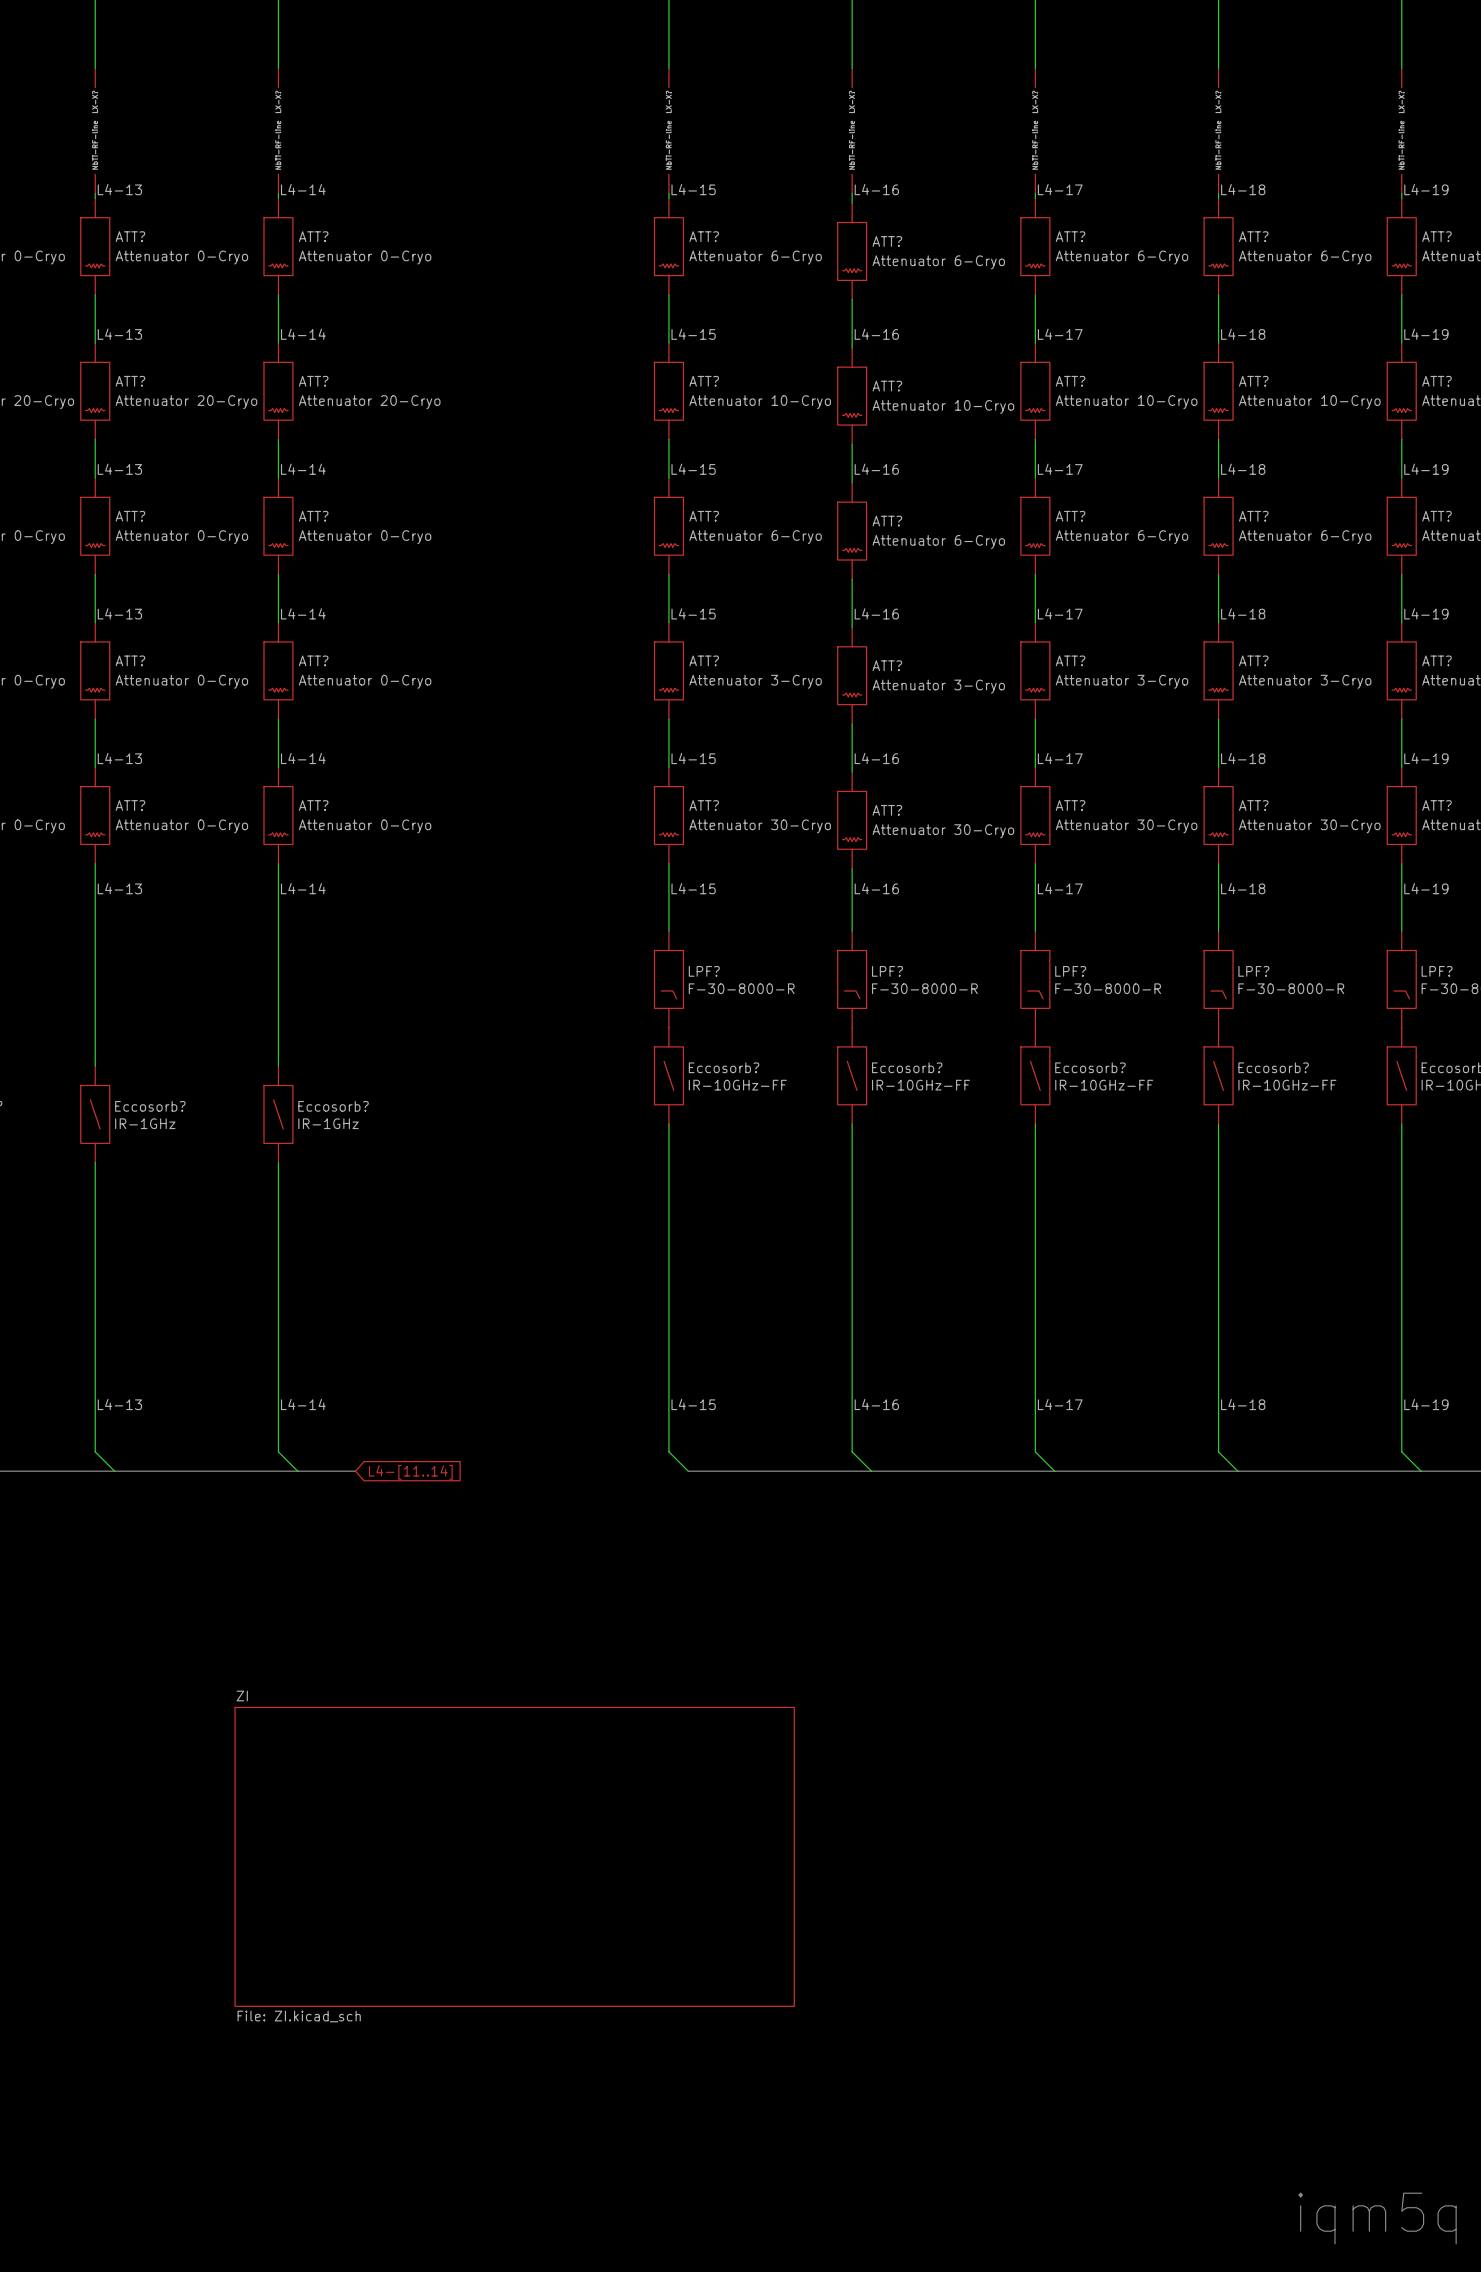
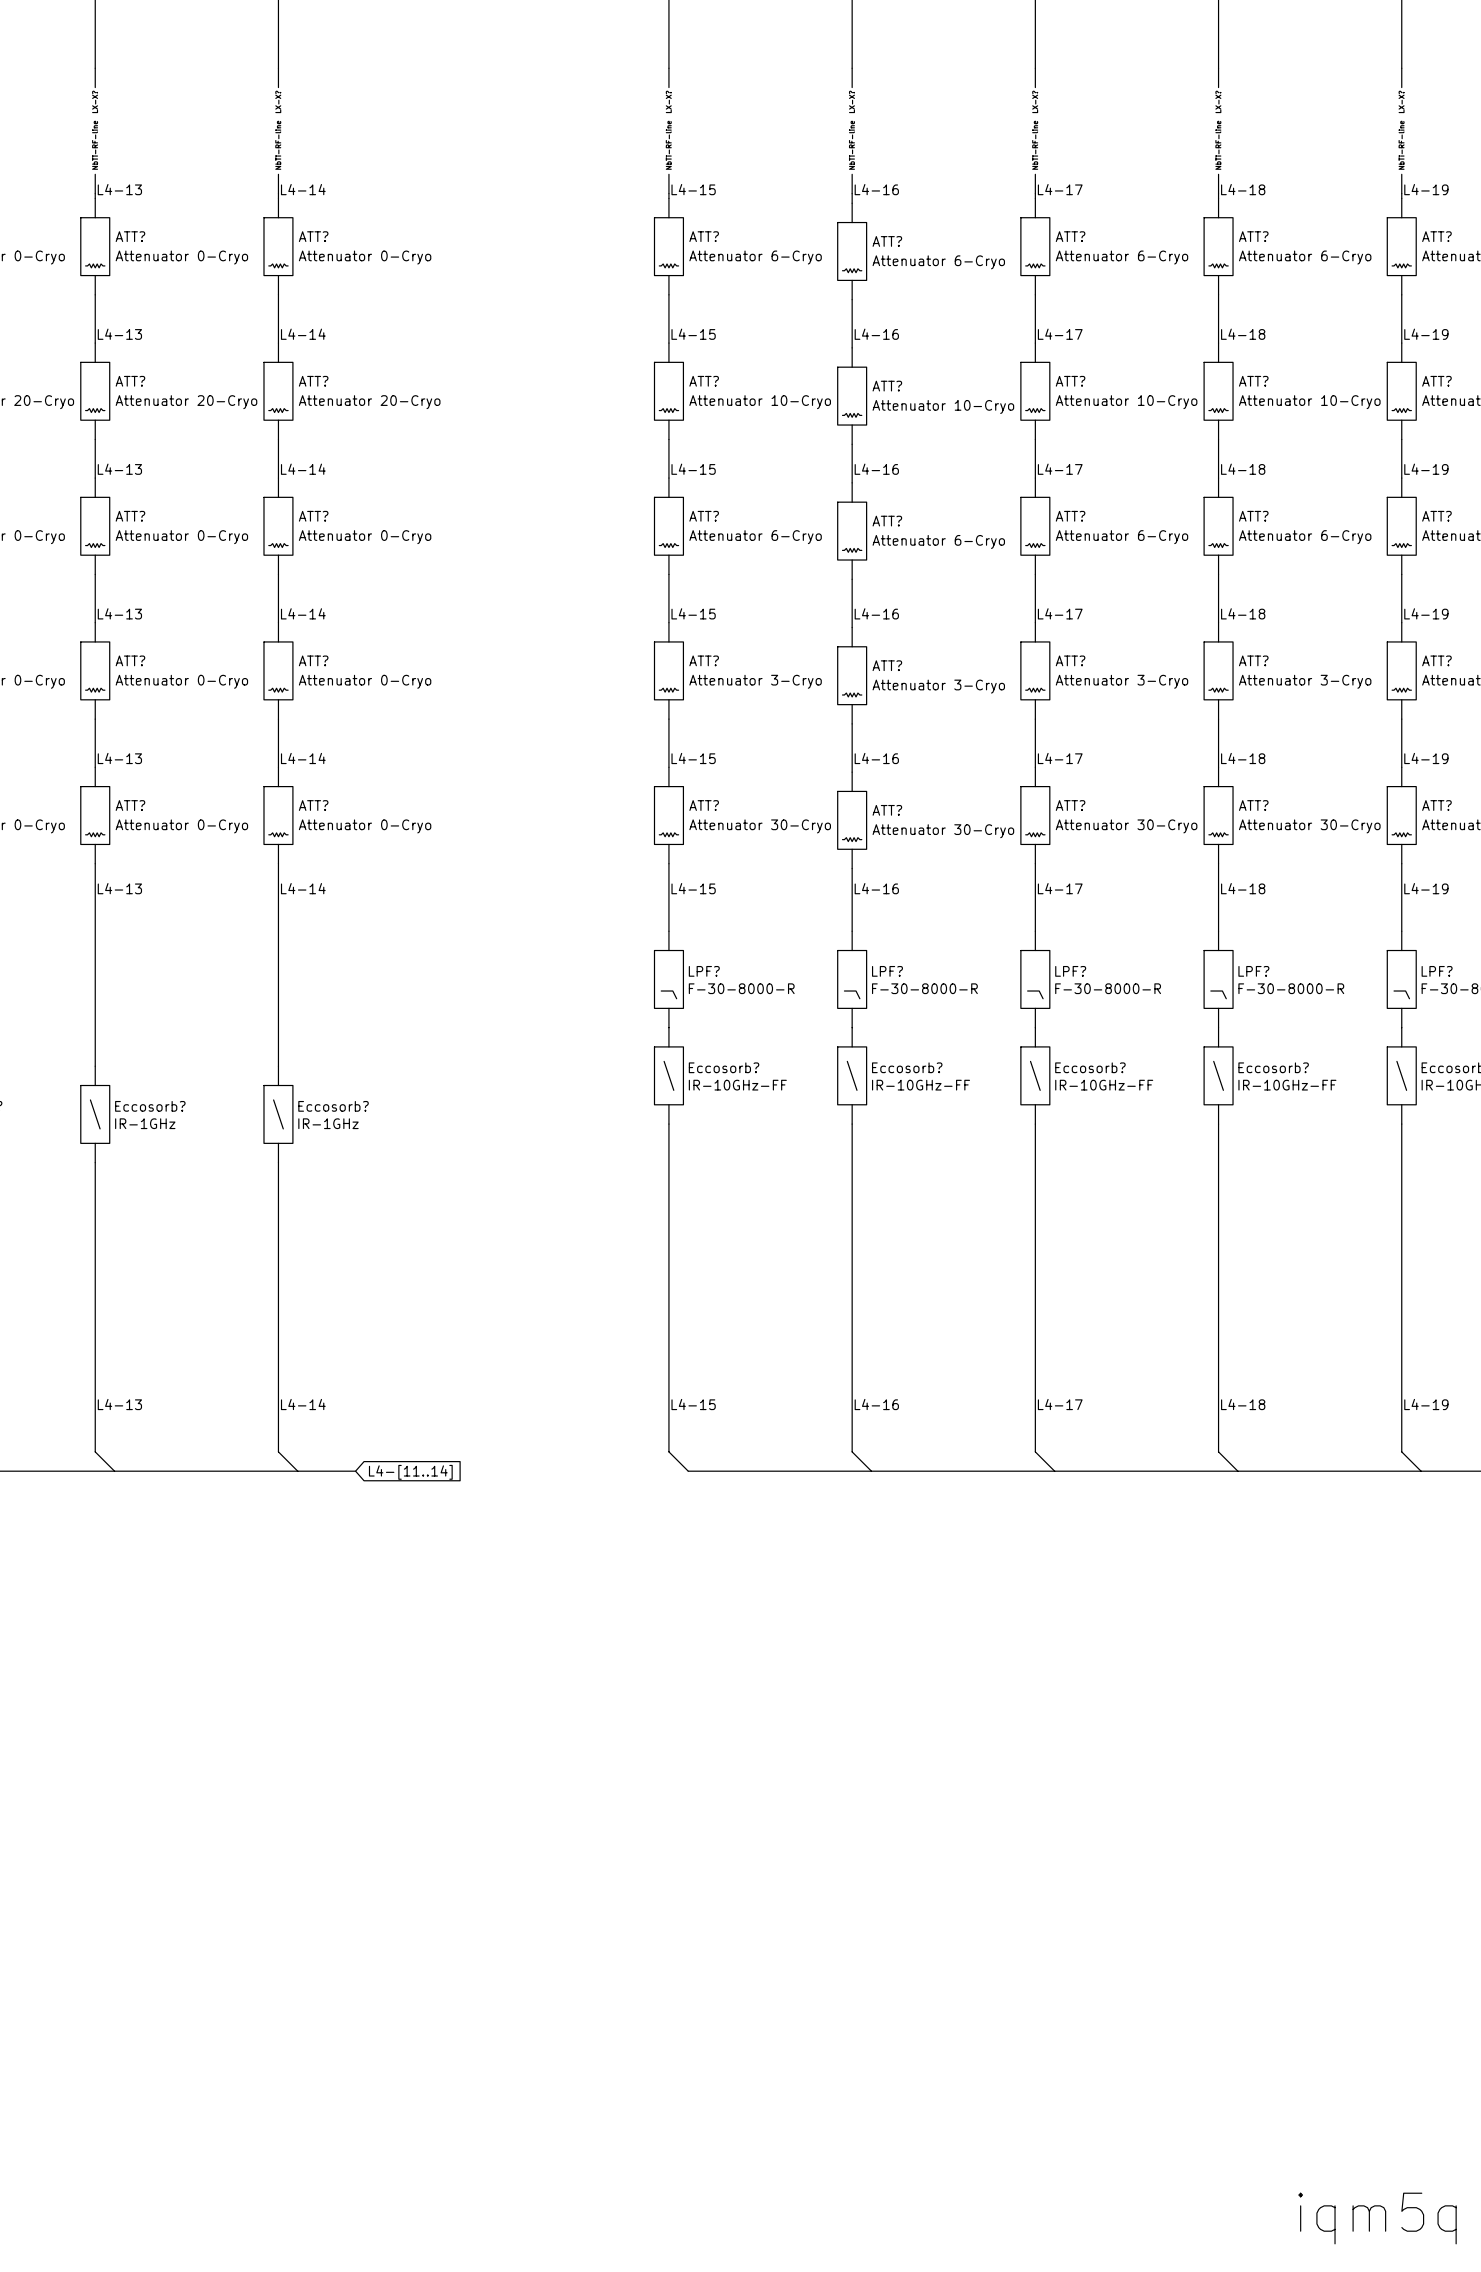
sheet ZI: File: ZI.kicad_sch (514, 1856) -> none

